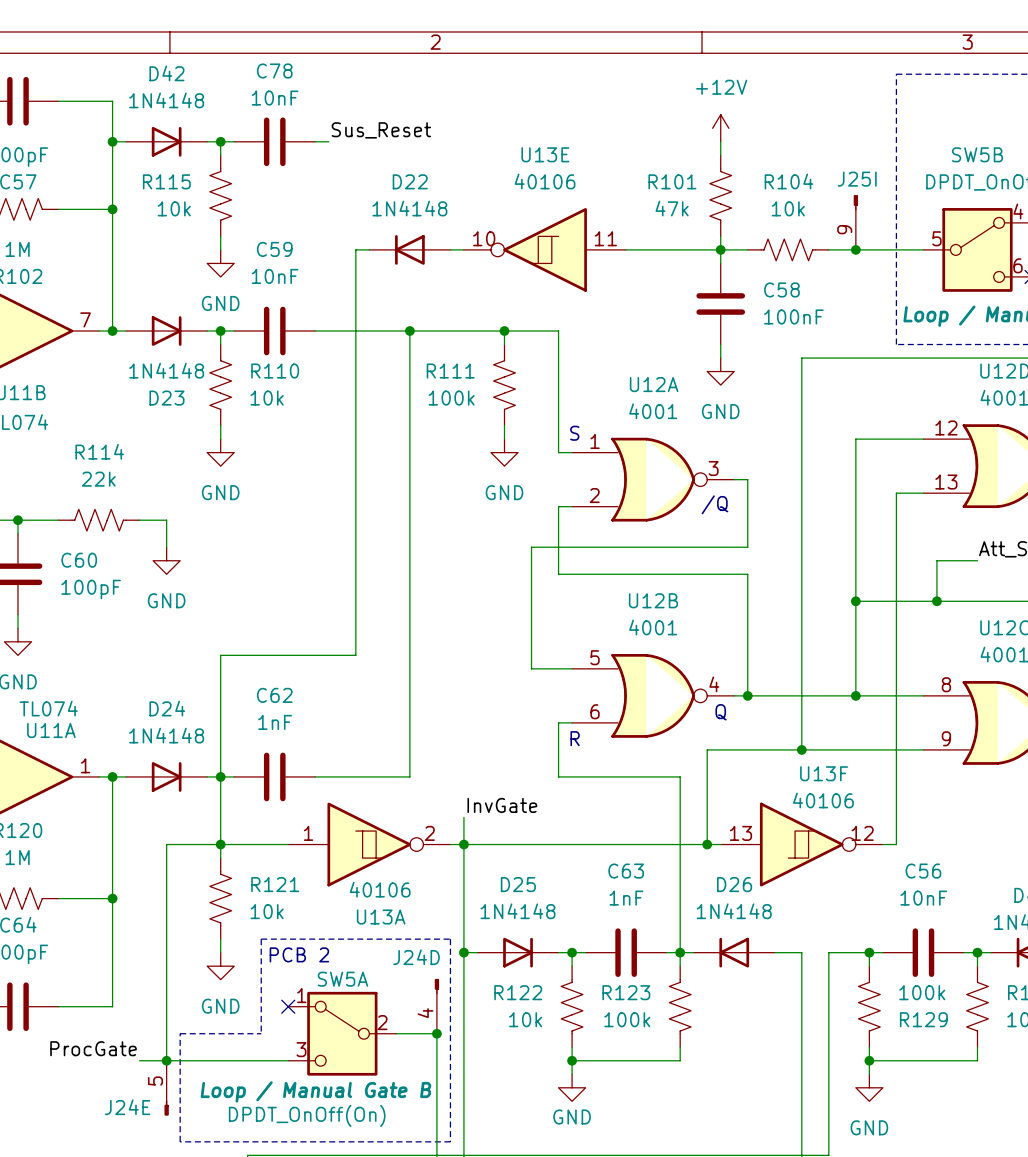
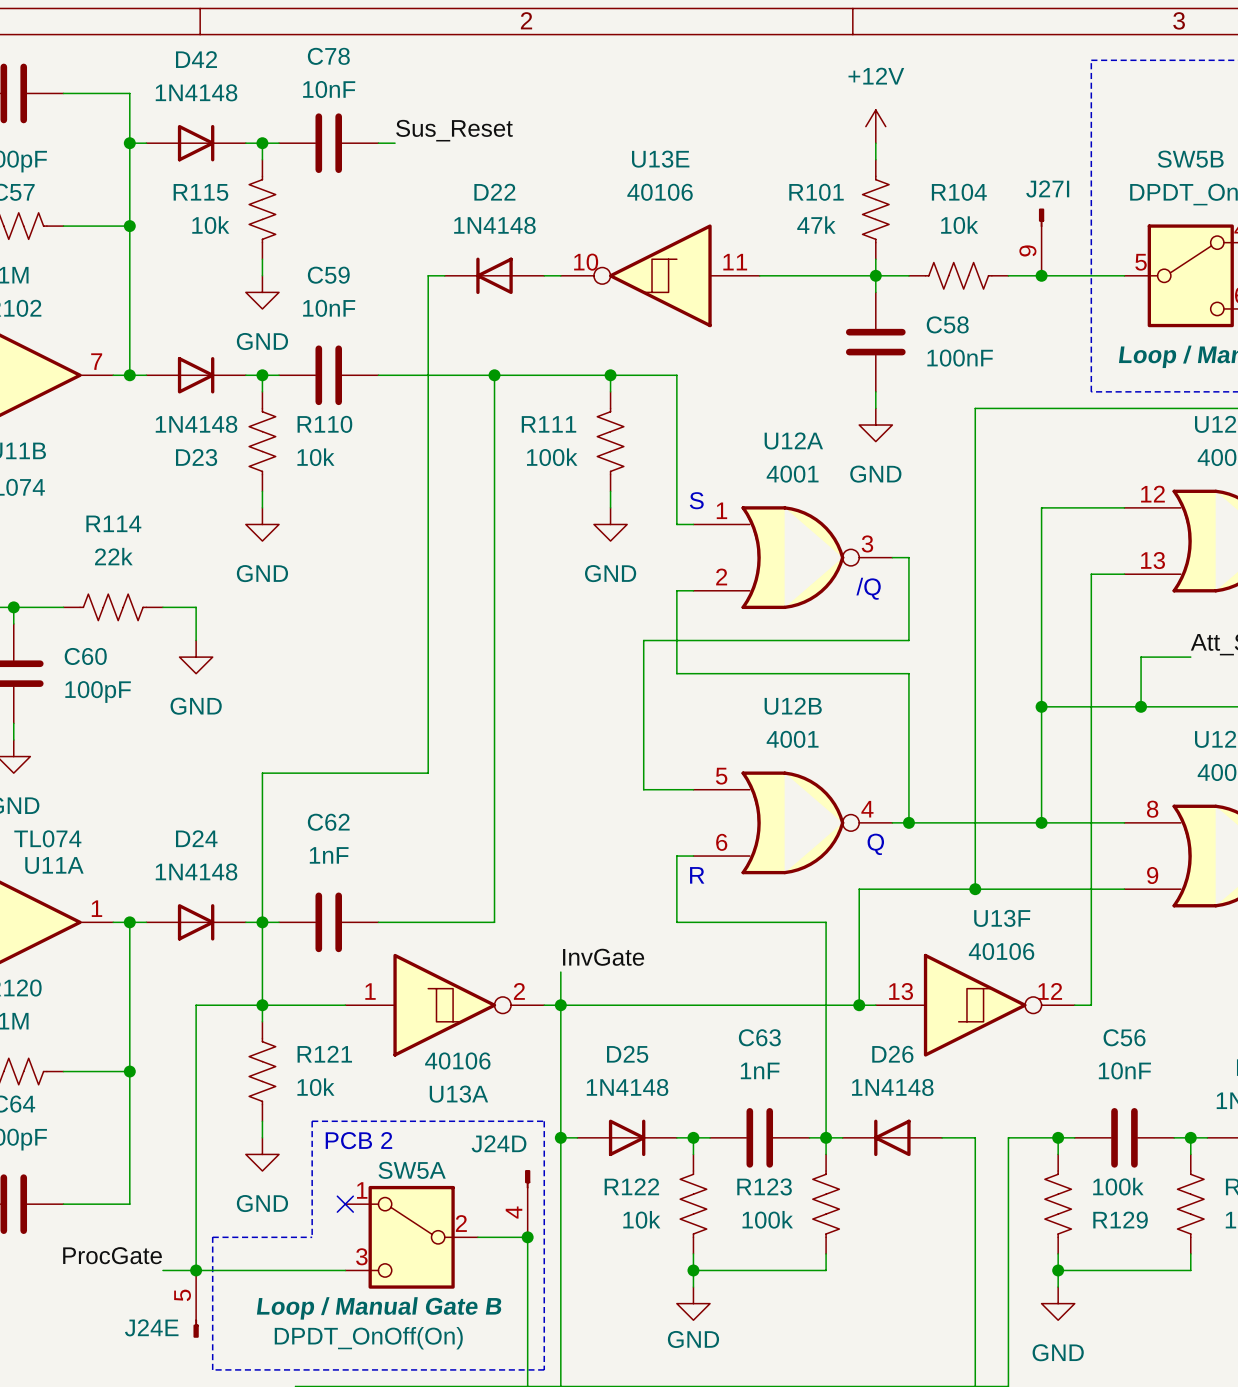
J25I name: J25I (857, 179) -> J27I (1047, 188)

